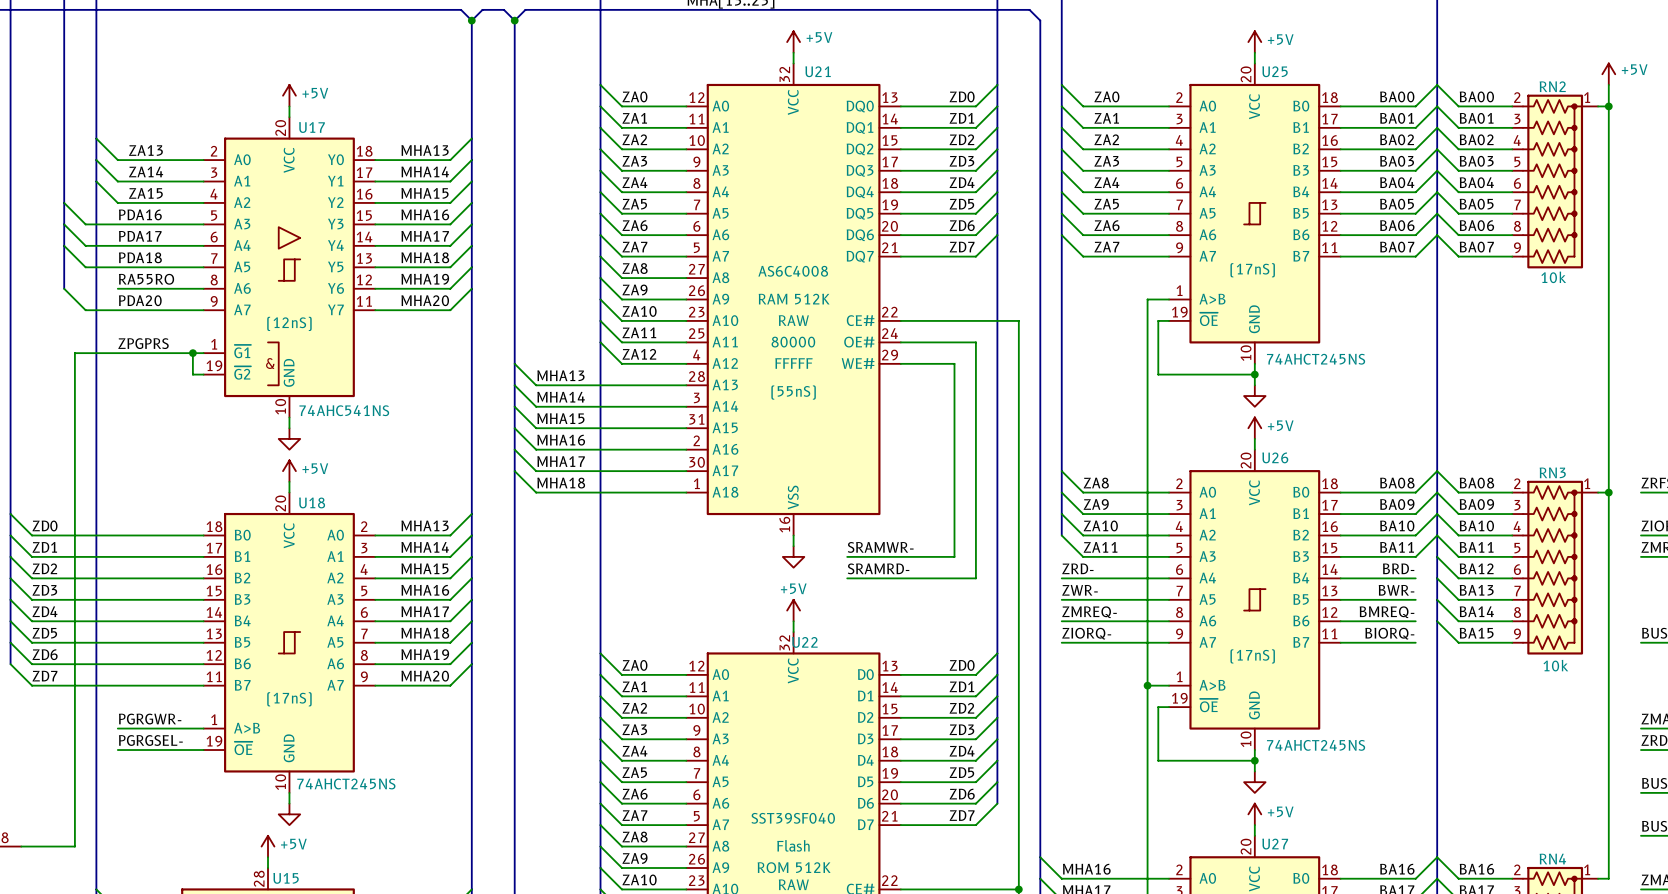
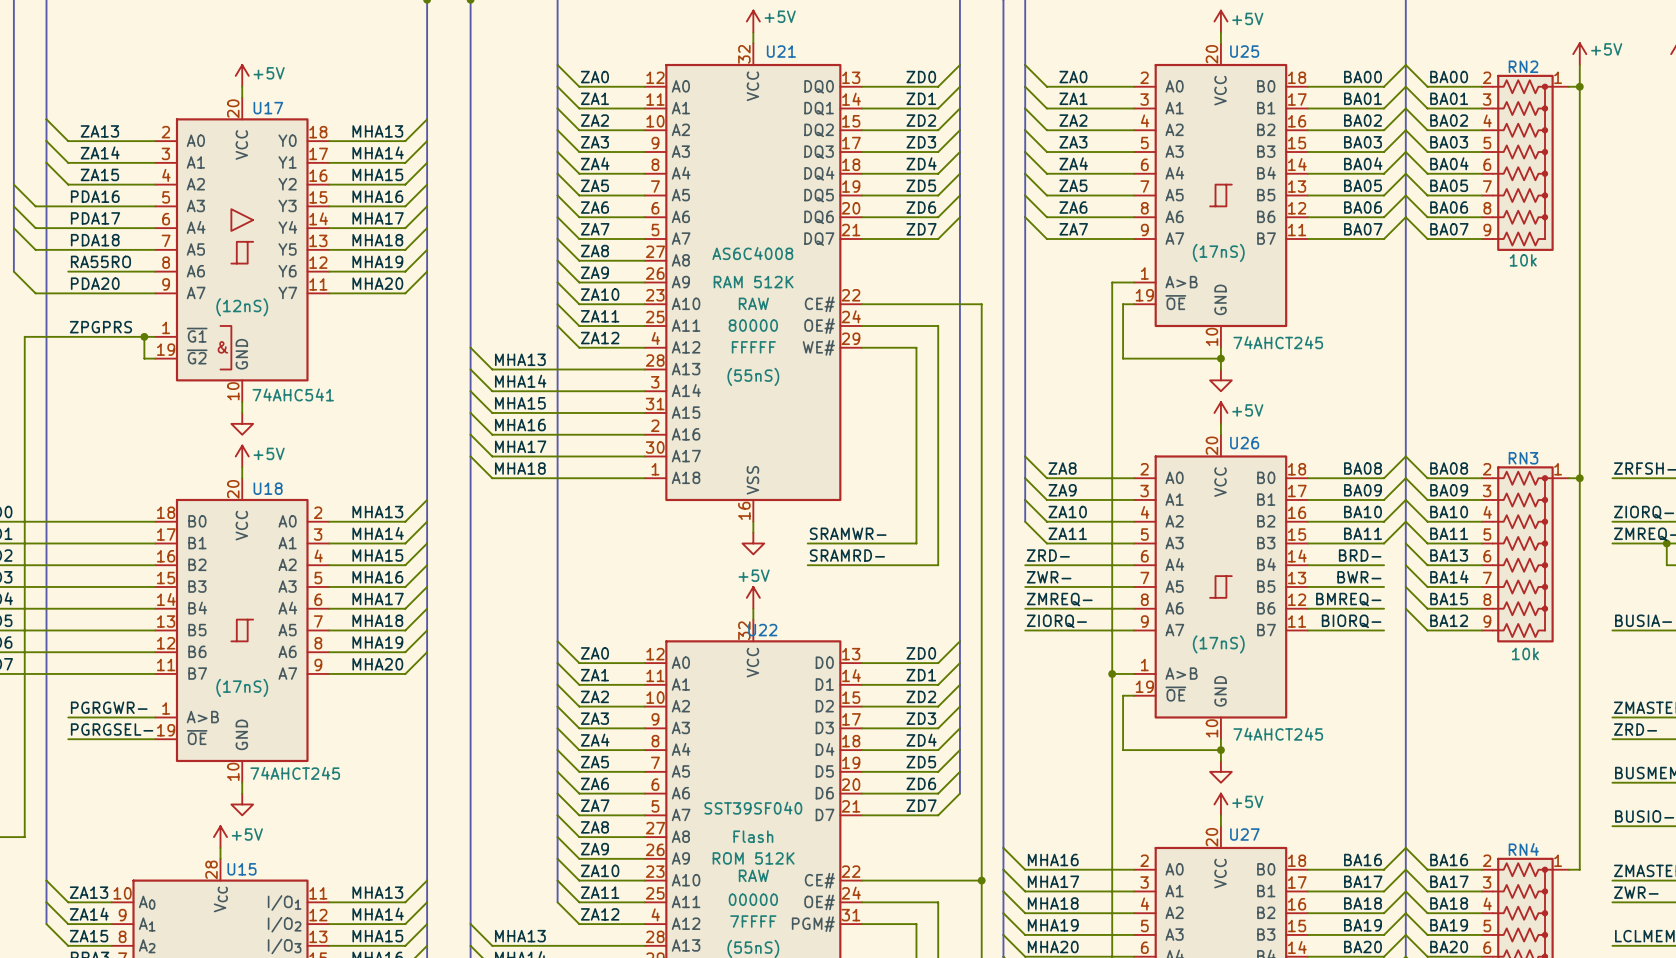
U25 value: 74AHCT245NS (1316, 359) -> 74AHCT245 (1278, 342)
U17 value: 74AHC541NS (344, 410) -> 74AHC541 (293, 394)
label: BA12 (1476, 568) -> BA13 (1449, 555)
label: BA13 (1476, 590) -> BA14 (1449, 577)
label: BA14 (1476, 611) -> BA15 (1449, 599)
label: BA15 (1476, 633) -> BA12 (1449, 620)
U26 value: 74AHCT245NS (1316, 745) -> 74AHCT245 (1278, 734)
U18 value: 74AHCT245NS (346, 783) -> 74AHCT245 (295, 773)

